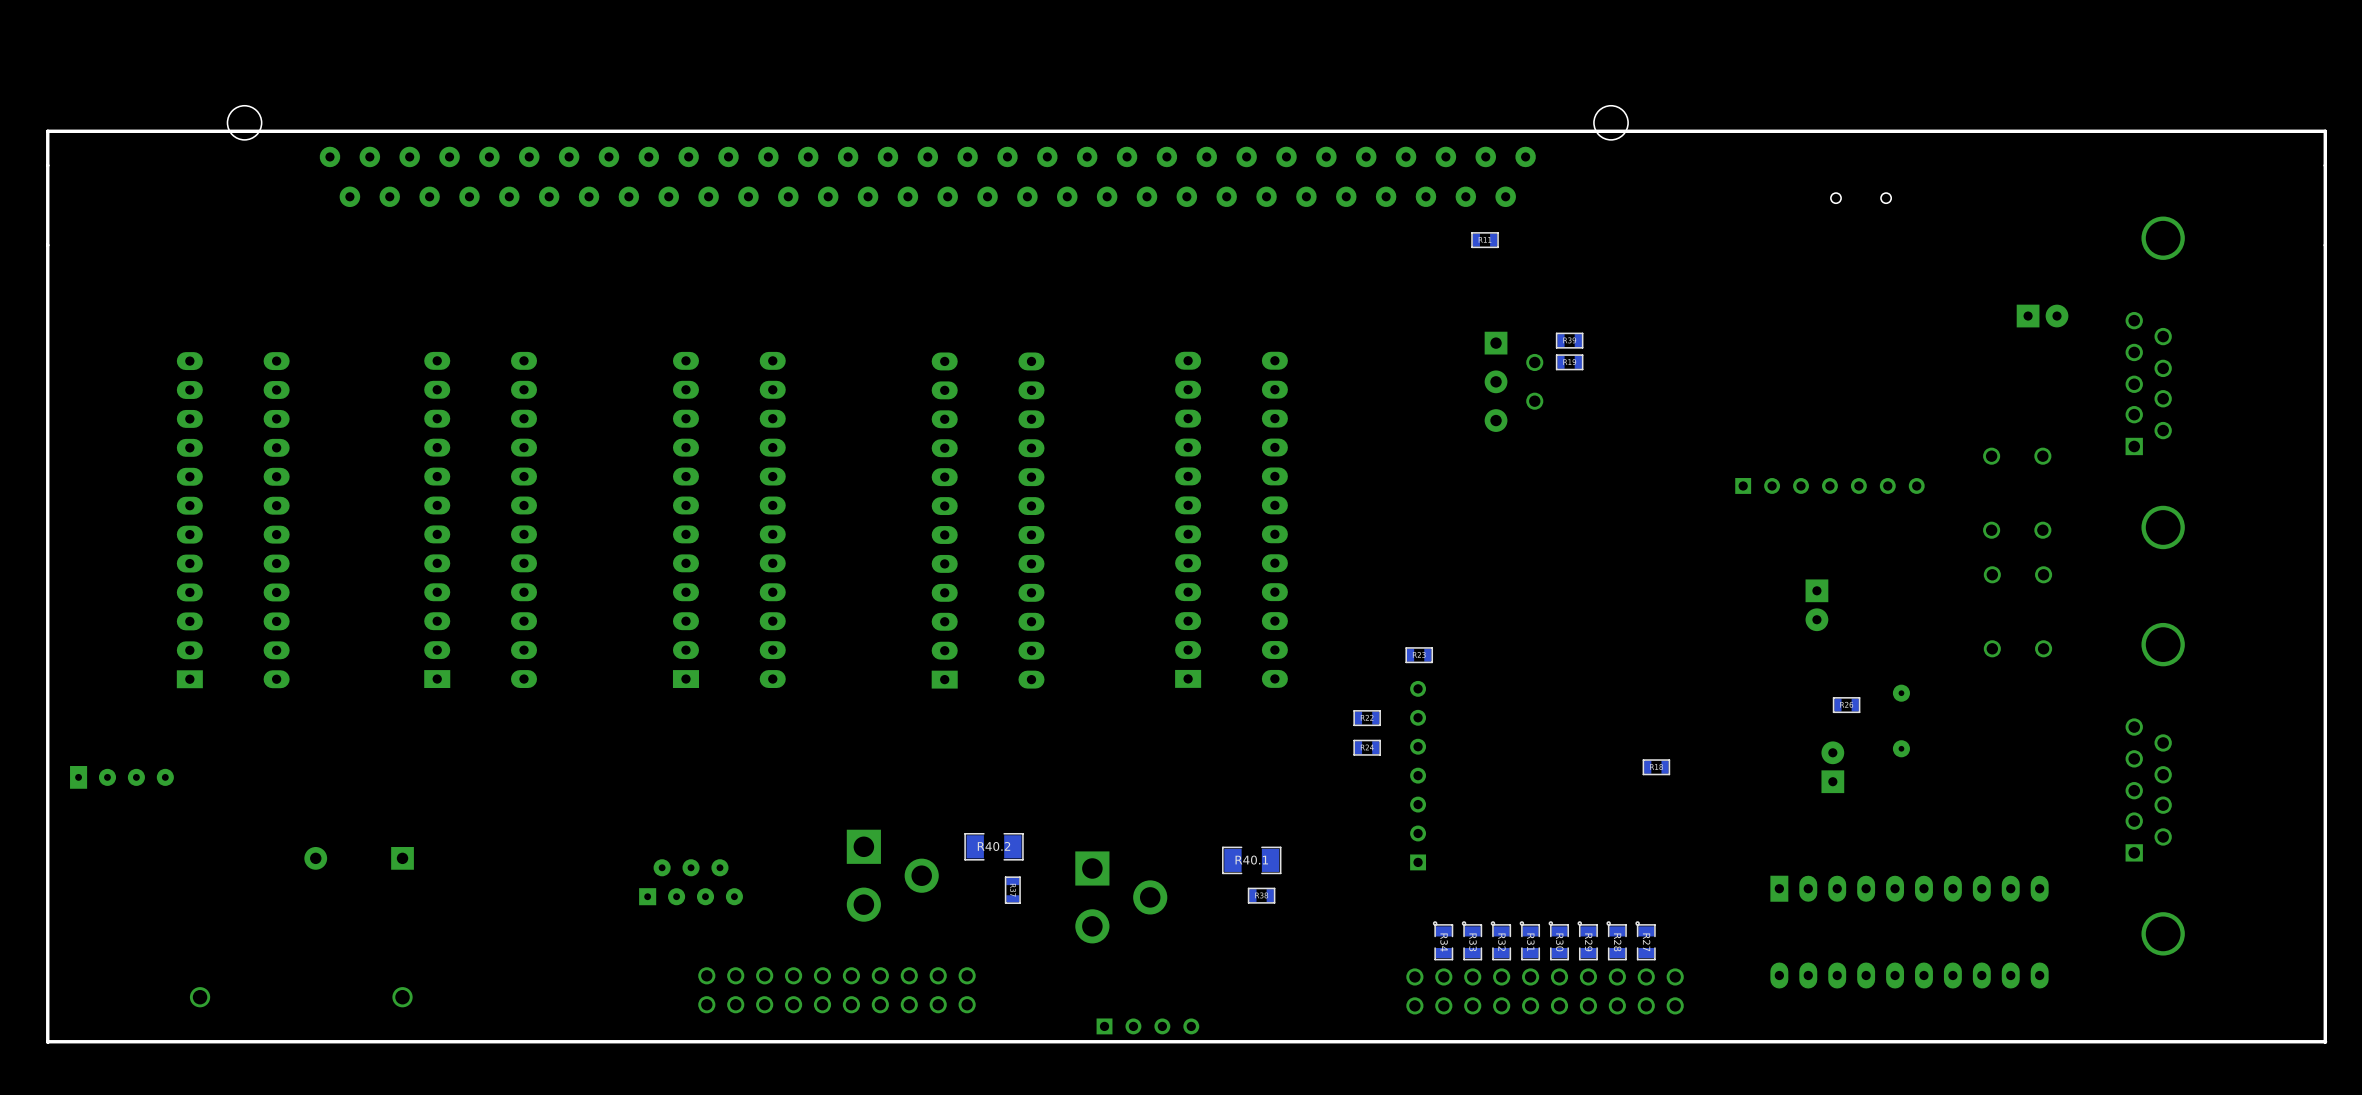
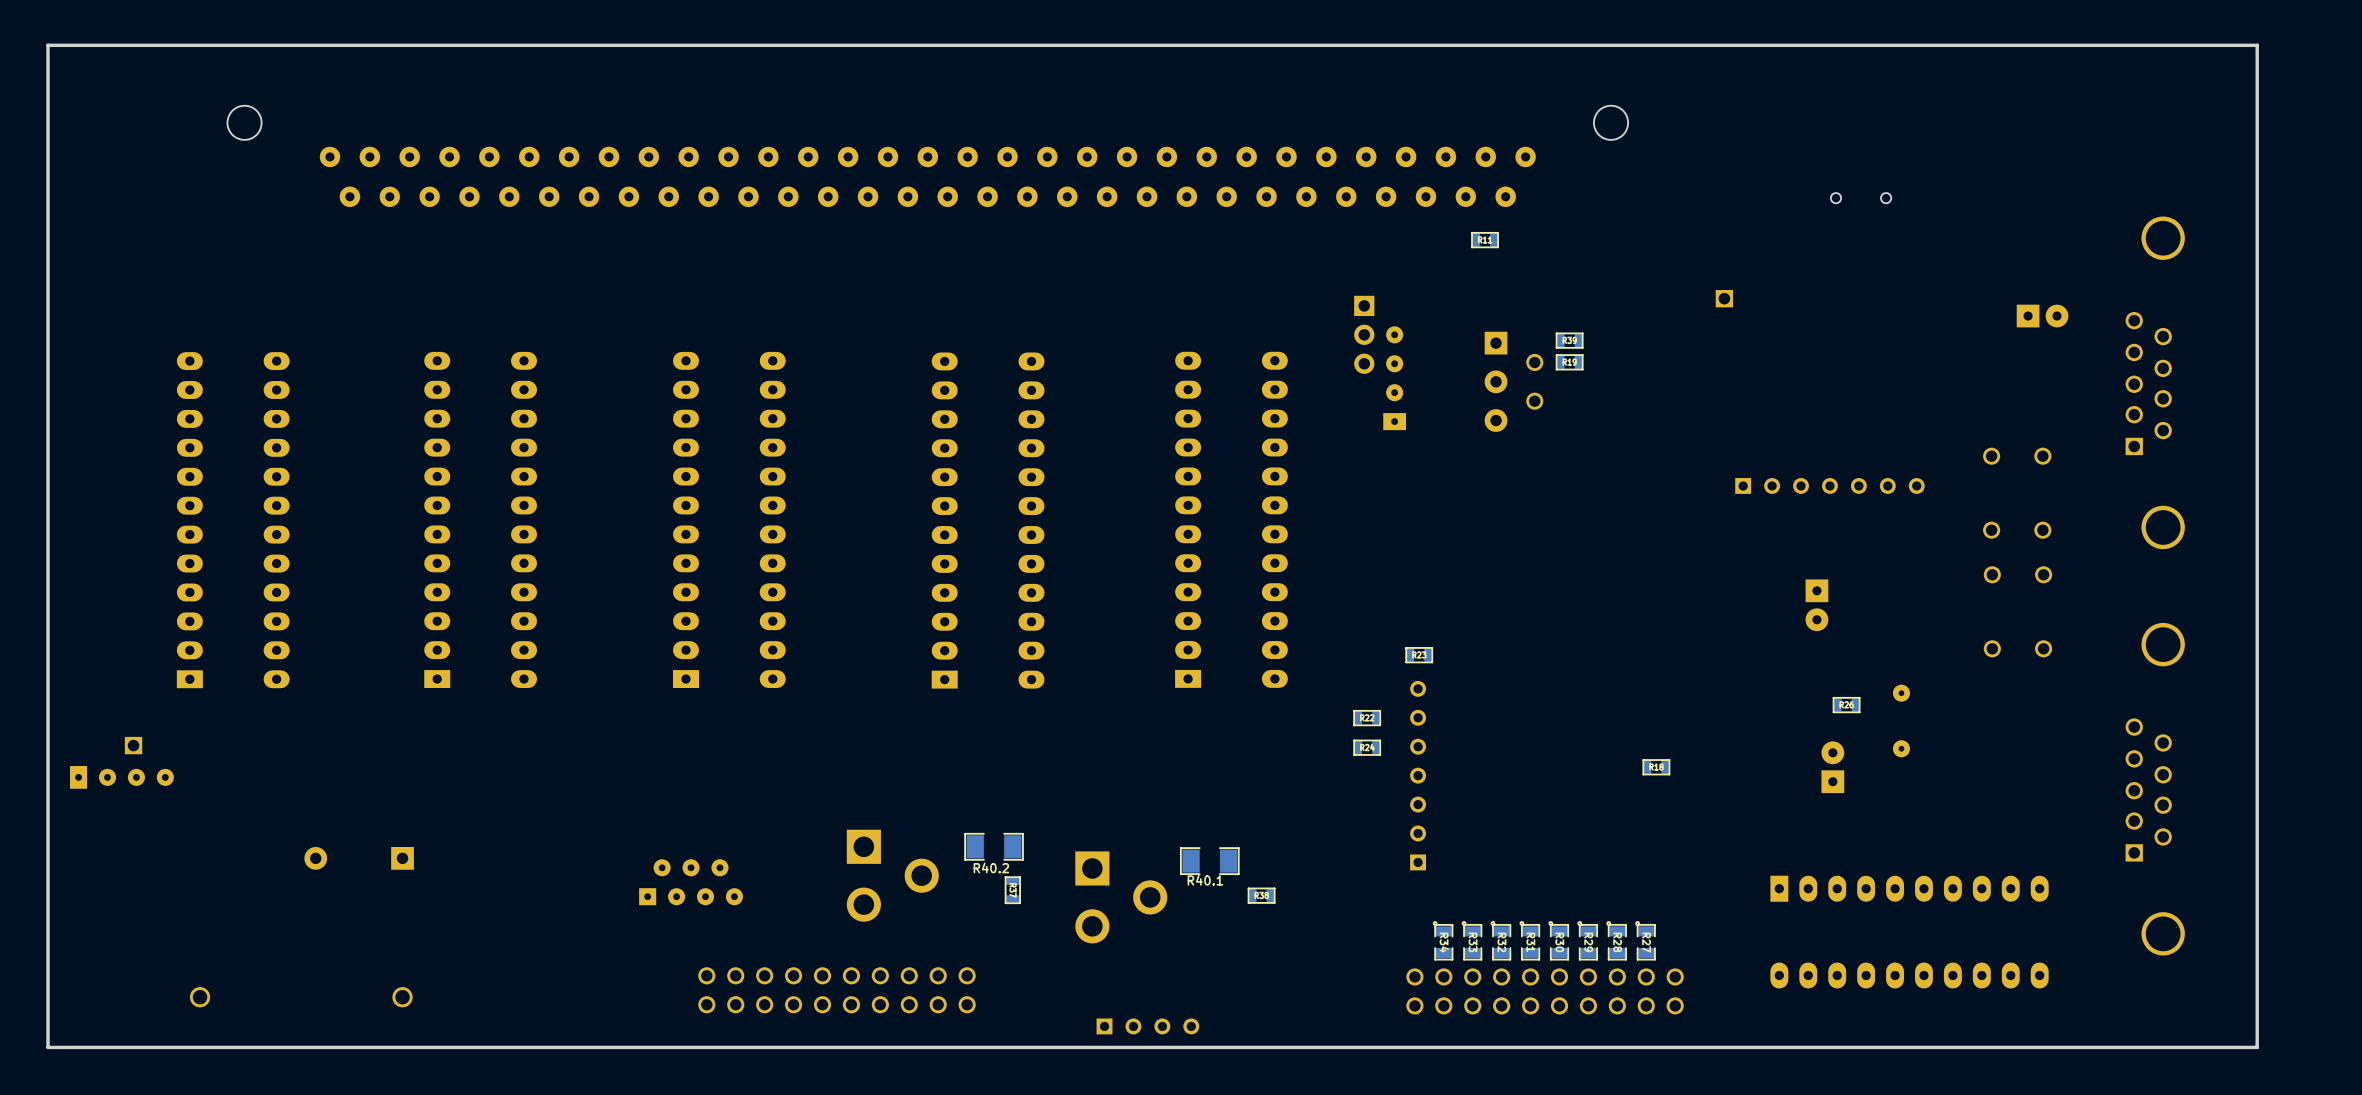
board edge: none -> (2257, 45) (2257, 1047) (48, 1047) (48, 45) (2257, 45)
part: none -> (1724, 298)
part: none -> (1364, 334)
part: none -> (1394, 378)
part: none -> (133, 745)
R40.2 name position: R40.2 (994, 846) -> R40.2 (991, 867)
R40.1 position: (1251, 860) -> (1209, 861)
R40.1 name position: R40.1 (1251, 860) -> R40.1 (1205, 880)
board edge: (2325, 1041) (48, 1041) -> none
board edge: (2325, 1042) (2325, 131) (47, 131) (47, 1042) -> none

